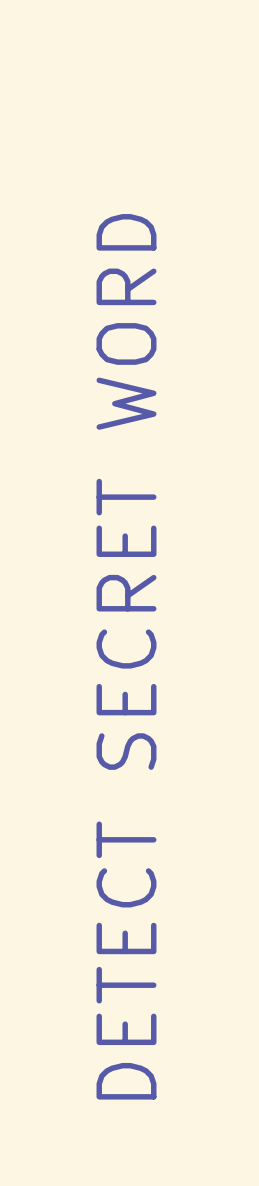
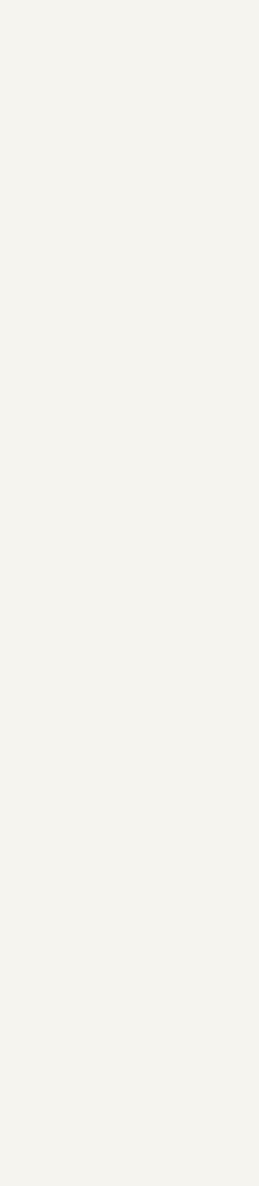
text: DETECT SECRET WORD (126, 656) -> none

